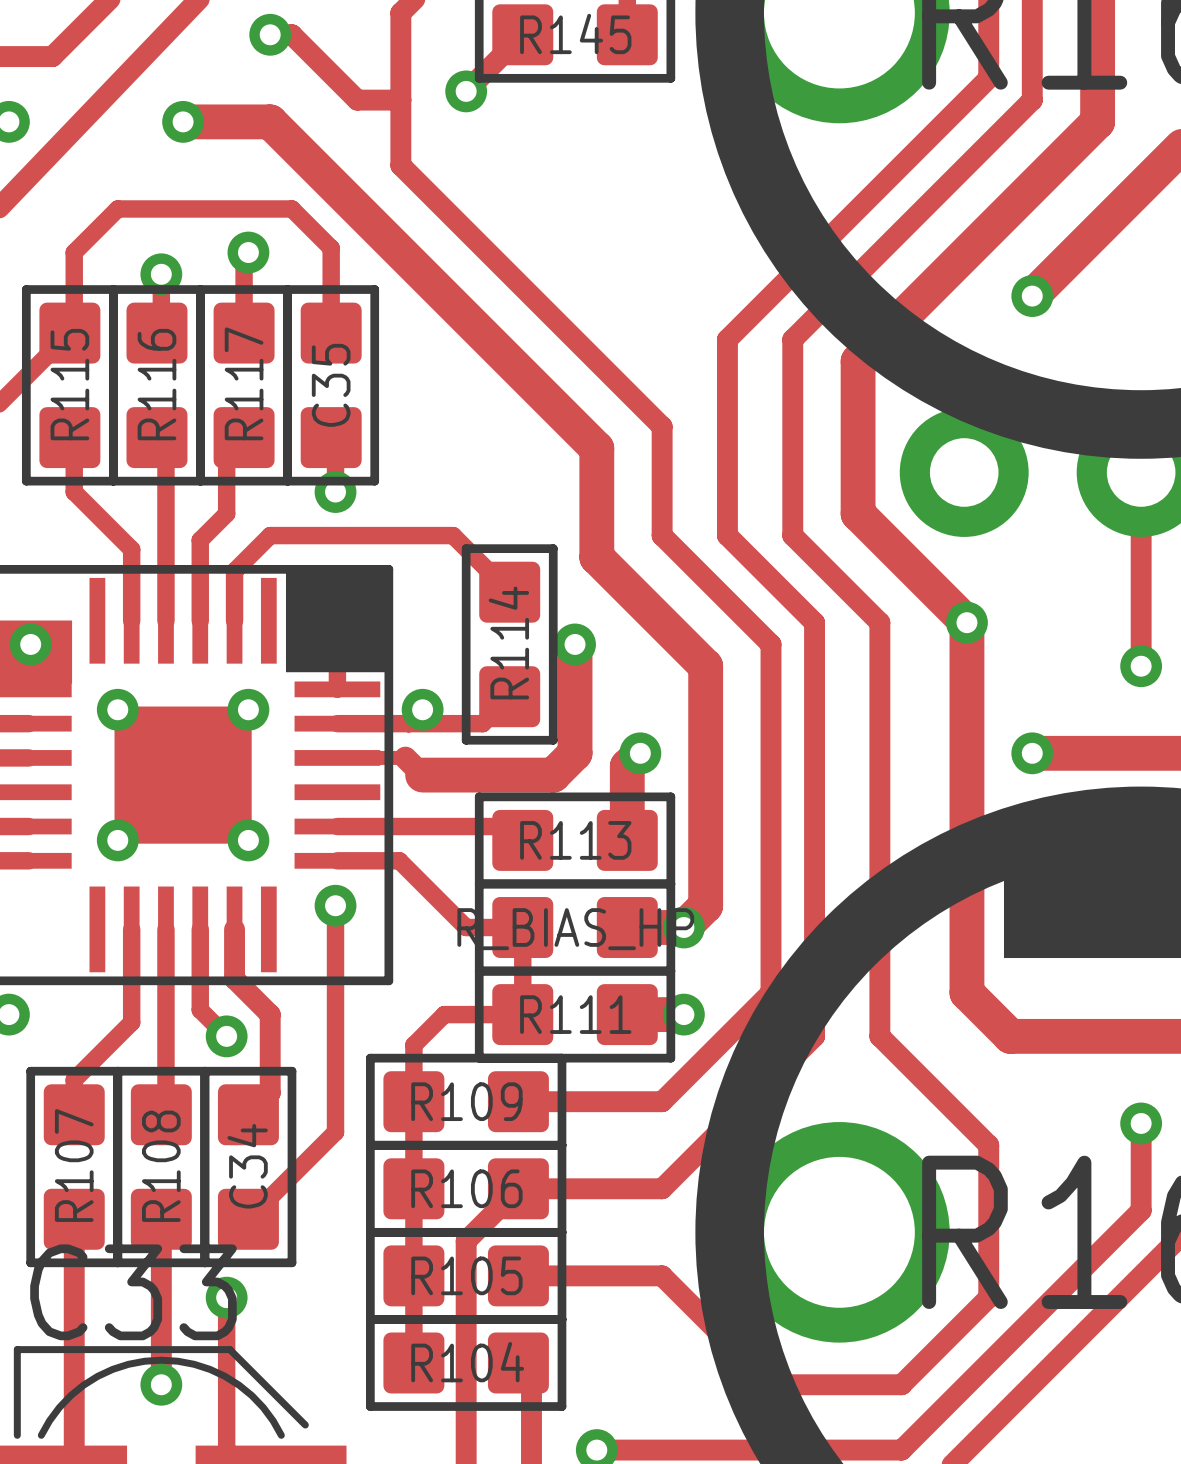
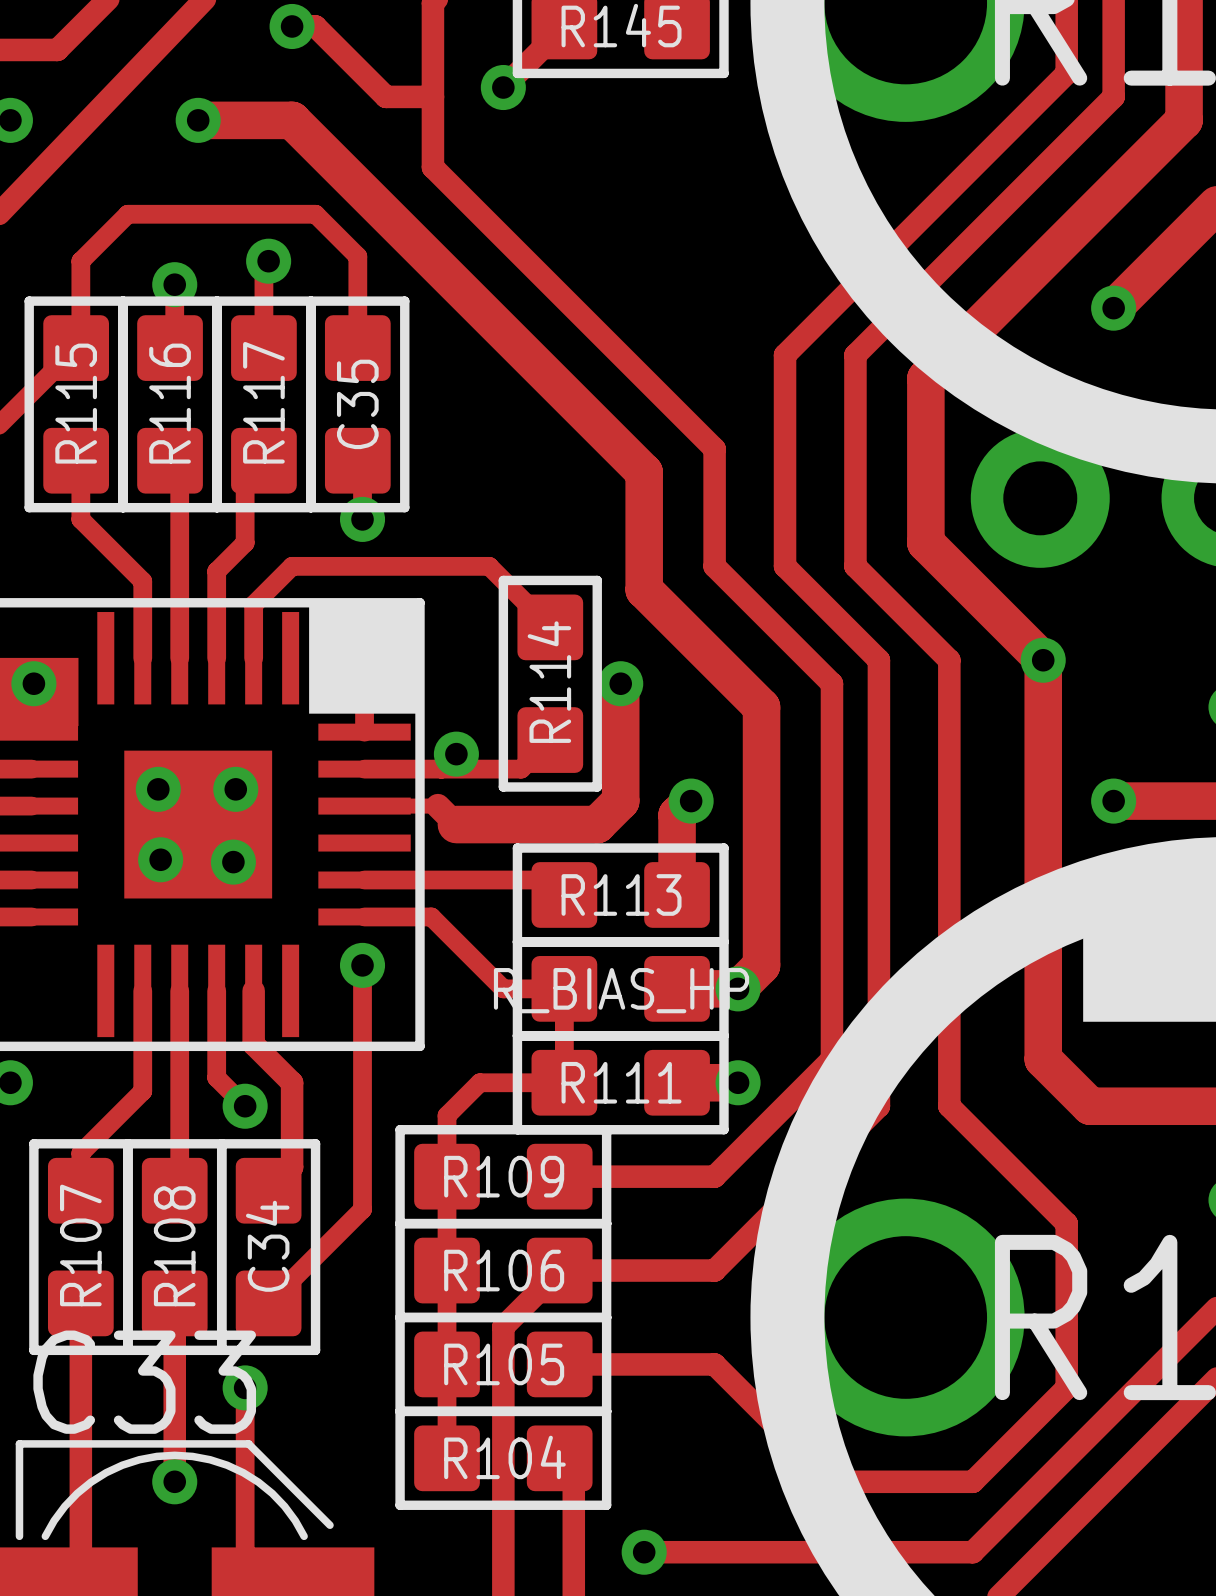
via position: (117, 709) -> (158, 789)
via position: (248, 709) -> (235, 789)
via position: (117, 840) -> (160, 859)
via position: (248, 840) -> (233, 862)

